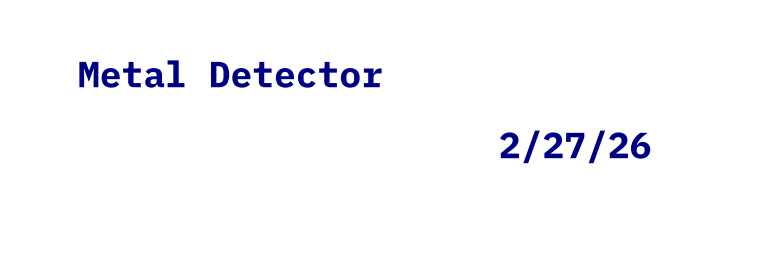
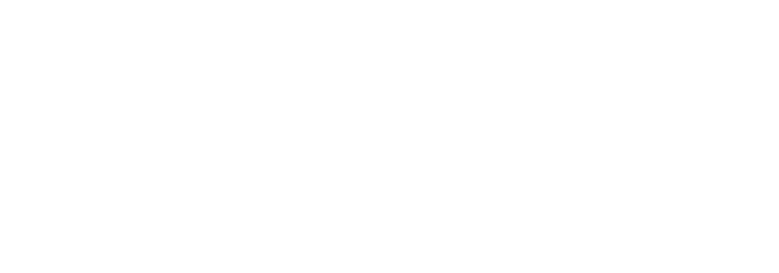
text: Metal Detector (230, 74) -> none
text: 2/27/26 (575, 146) -> none

